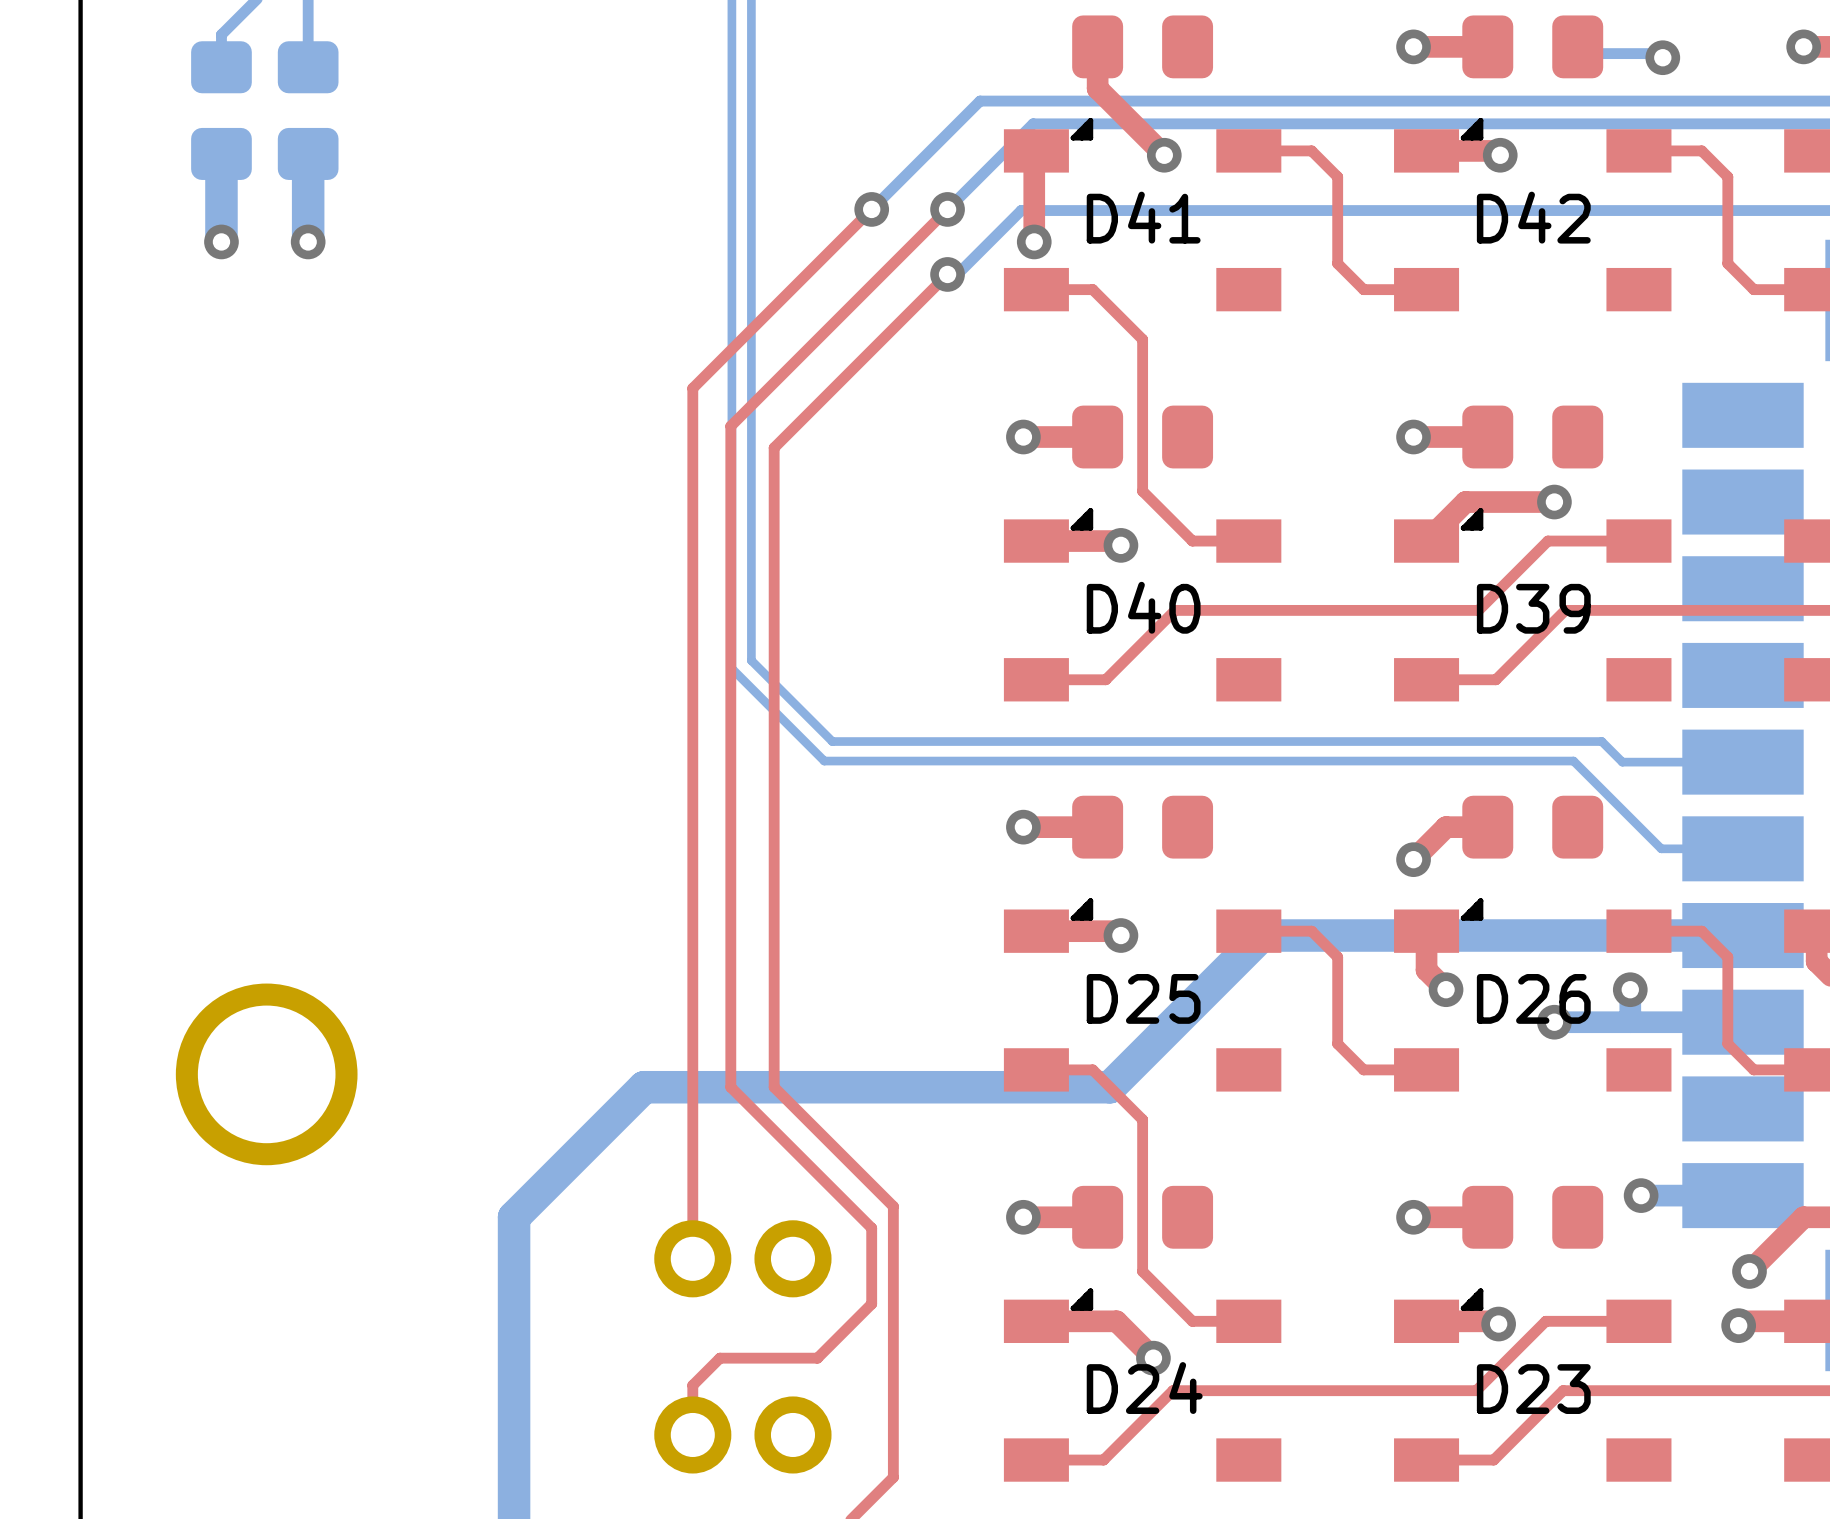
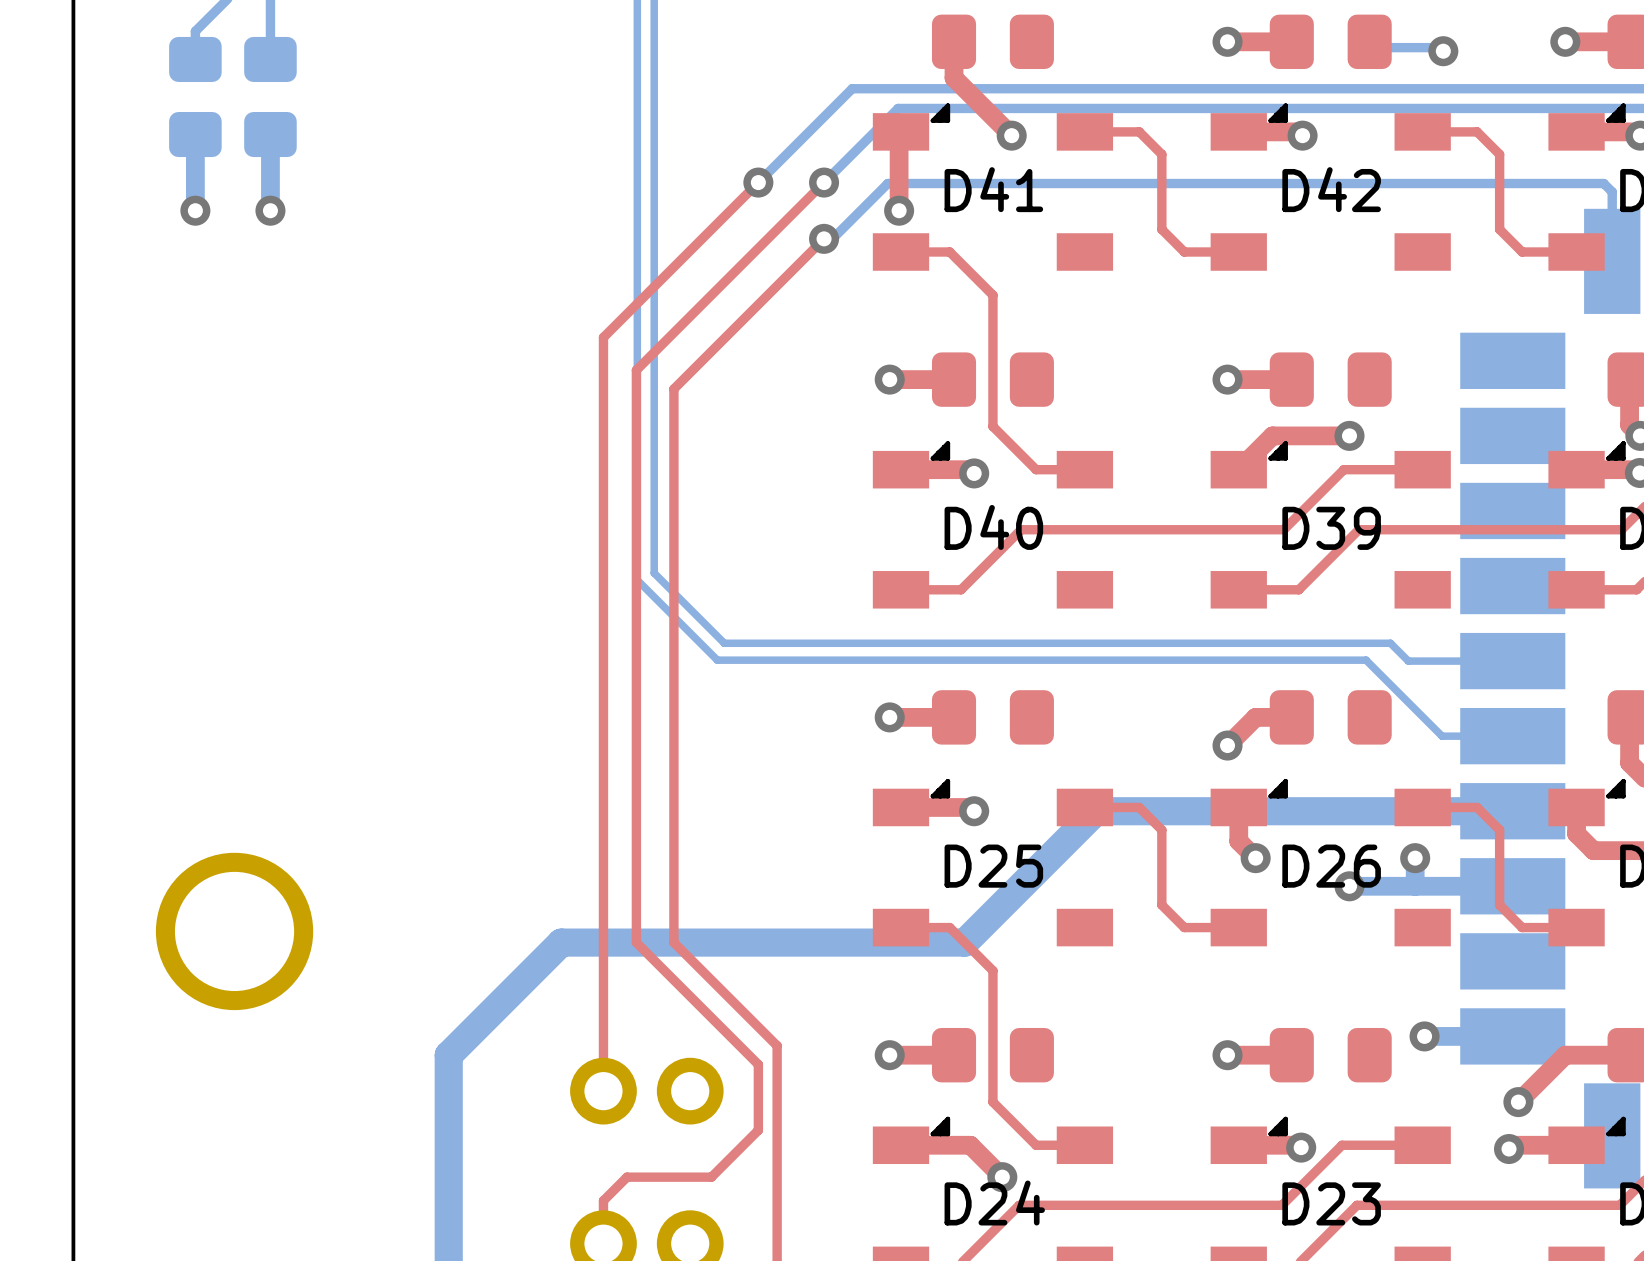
bottom track width: thick (221, 153) (221, 241) -> thin (195, 134) (195, 210)
bottom track width: thick (308, 153) (308, 241) -> thin (270, 134) (270, 210)

